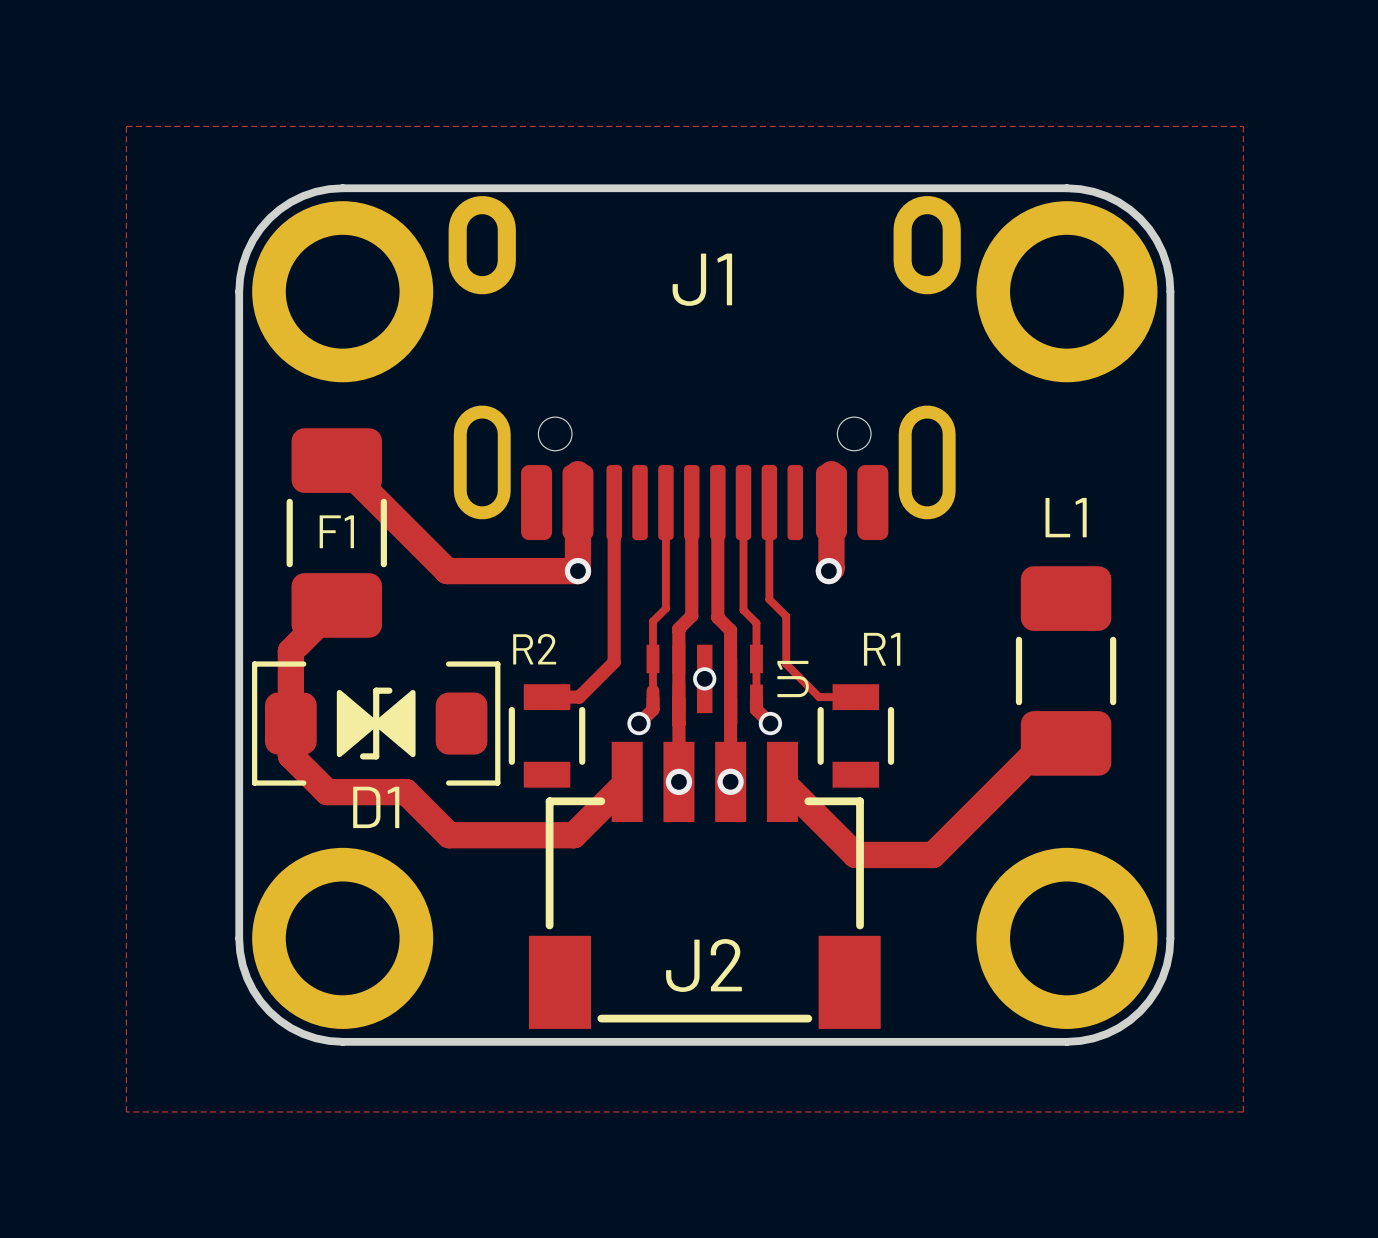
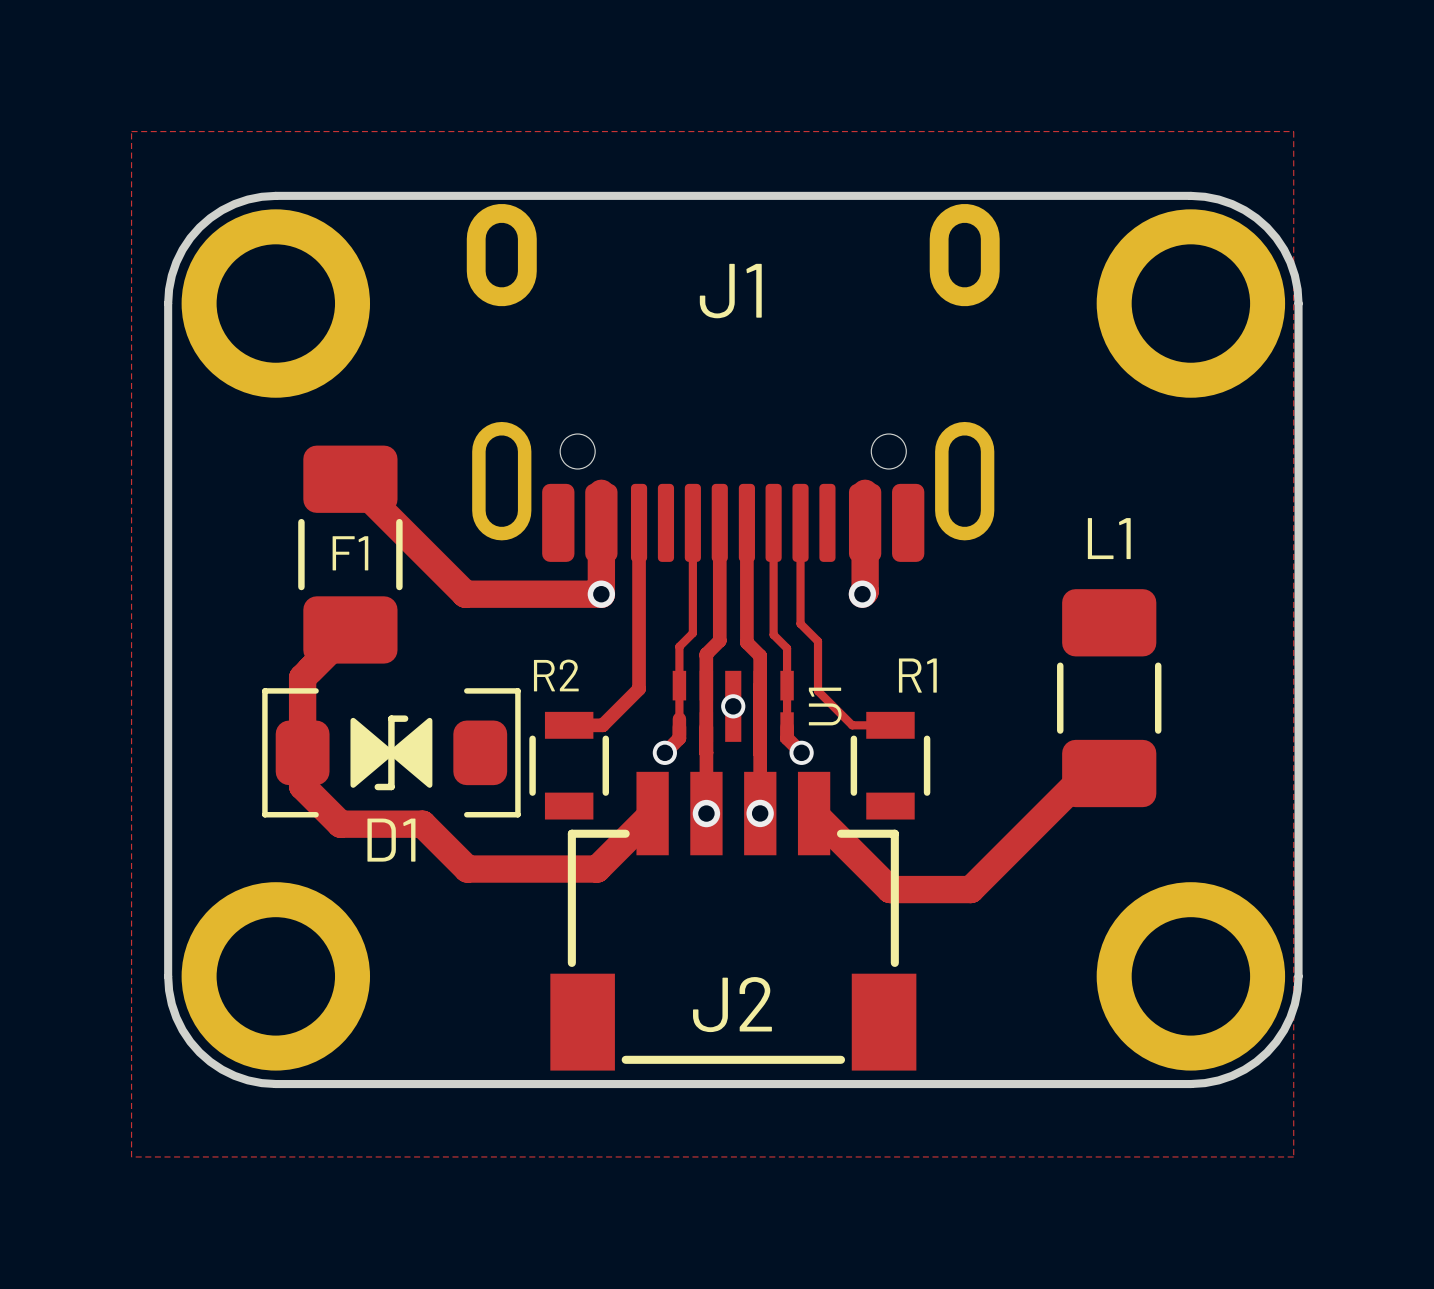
board edge: (342, 188) (315, 191) (303, 196) (279, 209) (269, 218) (253, 239) (247, 252) (242, 264) (239, 291) (240, 951) (247, 977) (253, 990) (260, 1001) (279, 1020) (303, 1033) (315, 1038) (342, 1041) -> (356, 195) (261, 196) (247, 199) (221, 210) (199, 227) (182, 249) (171, 275) (168, 303) (168, 976) (171, 1004) (182, 1030) (190, 1041) (210, 1061) (234, 1075) (261, 1083) (356, 1084)
board edge: (1066, 188) (1093, 191) (1106, 196) (1129, 209) (1140, 218) (1156, 239) (1162, 252) (1166, 264) (1170, 291) (1169, 951) (1162, 977) (1156, 990) (1149, 1001) (1129, 1020) (1106, 1033) (1093, 1038) (1066, 1041) -> (1110, 195) (1204, 196) (1232, 204) (1244, 210) (1267, 227) (1284, 249) (1294, 275) (1298, 303) (1298, 976) (1294, 1004) (1290, 1017) (1276, 1041) (1256, 1061) (1232, 1075) (1204, 1083) (1110, 1084)
part position: (342, 291) -> (275, 303)
part position: (1066, 291) -> (1190, 303)
part position: (342, 938) -> (275, 976)
part position: (1066, 938) -> (1190, 976)

